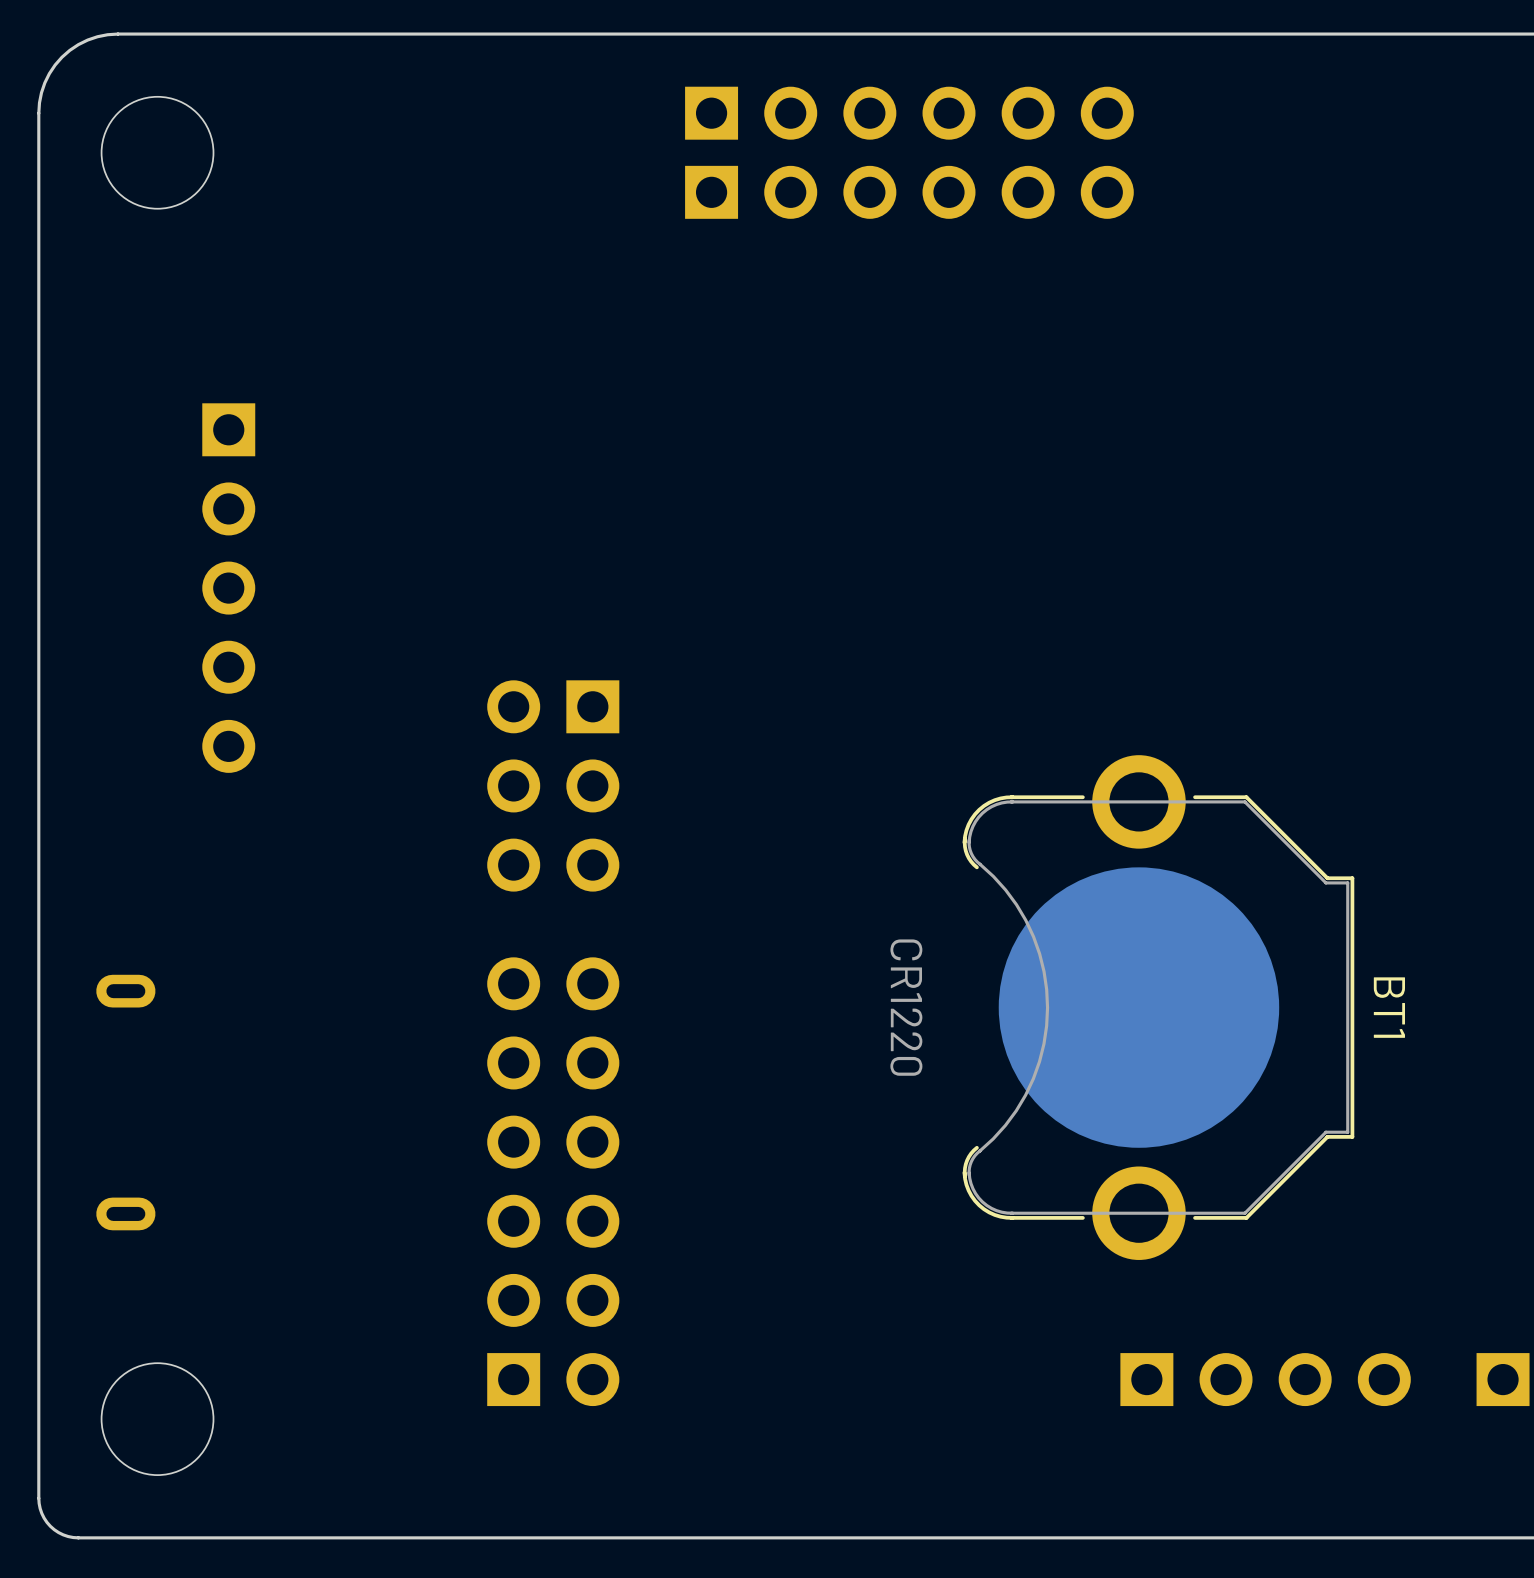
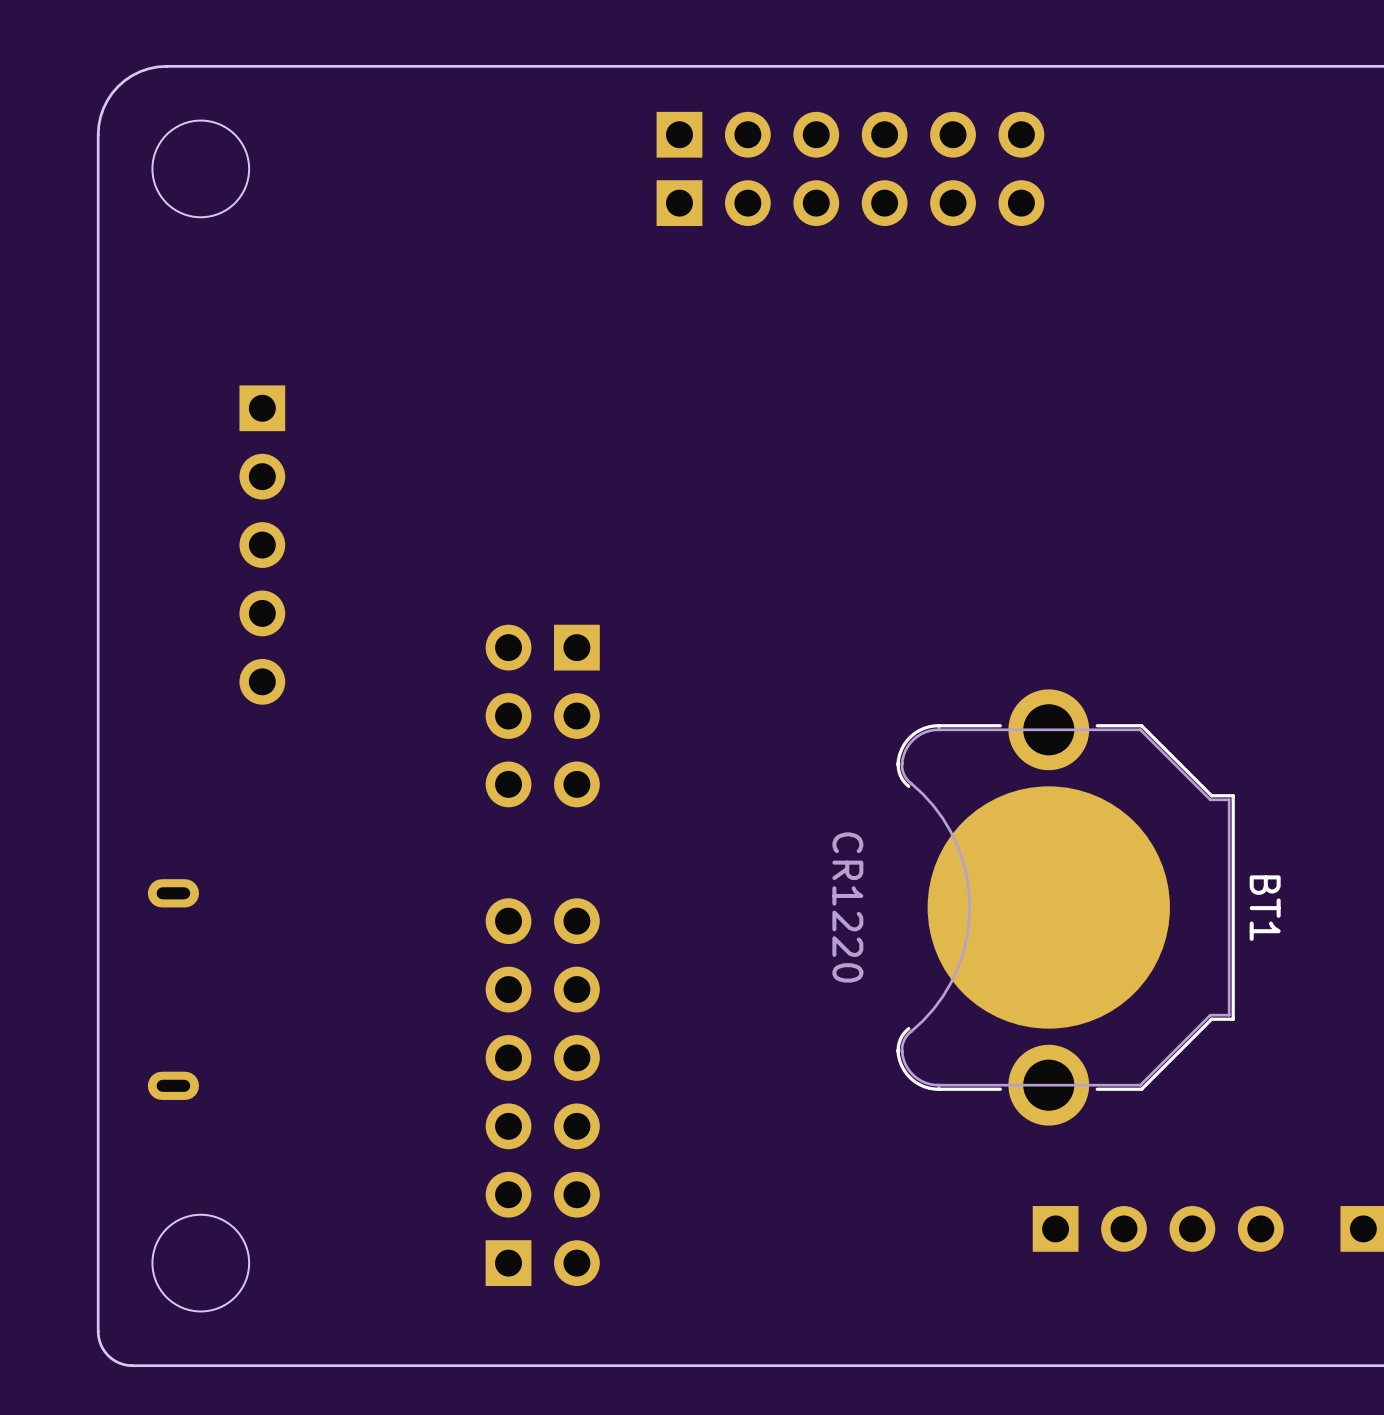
part position: (553, 1181) -> (542, 1092)

